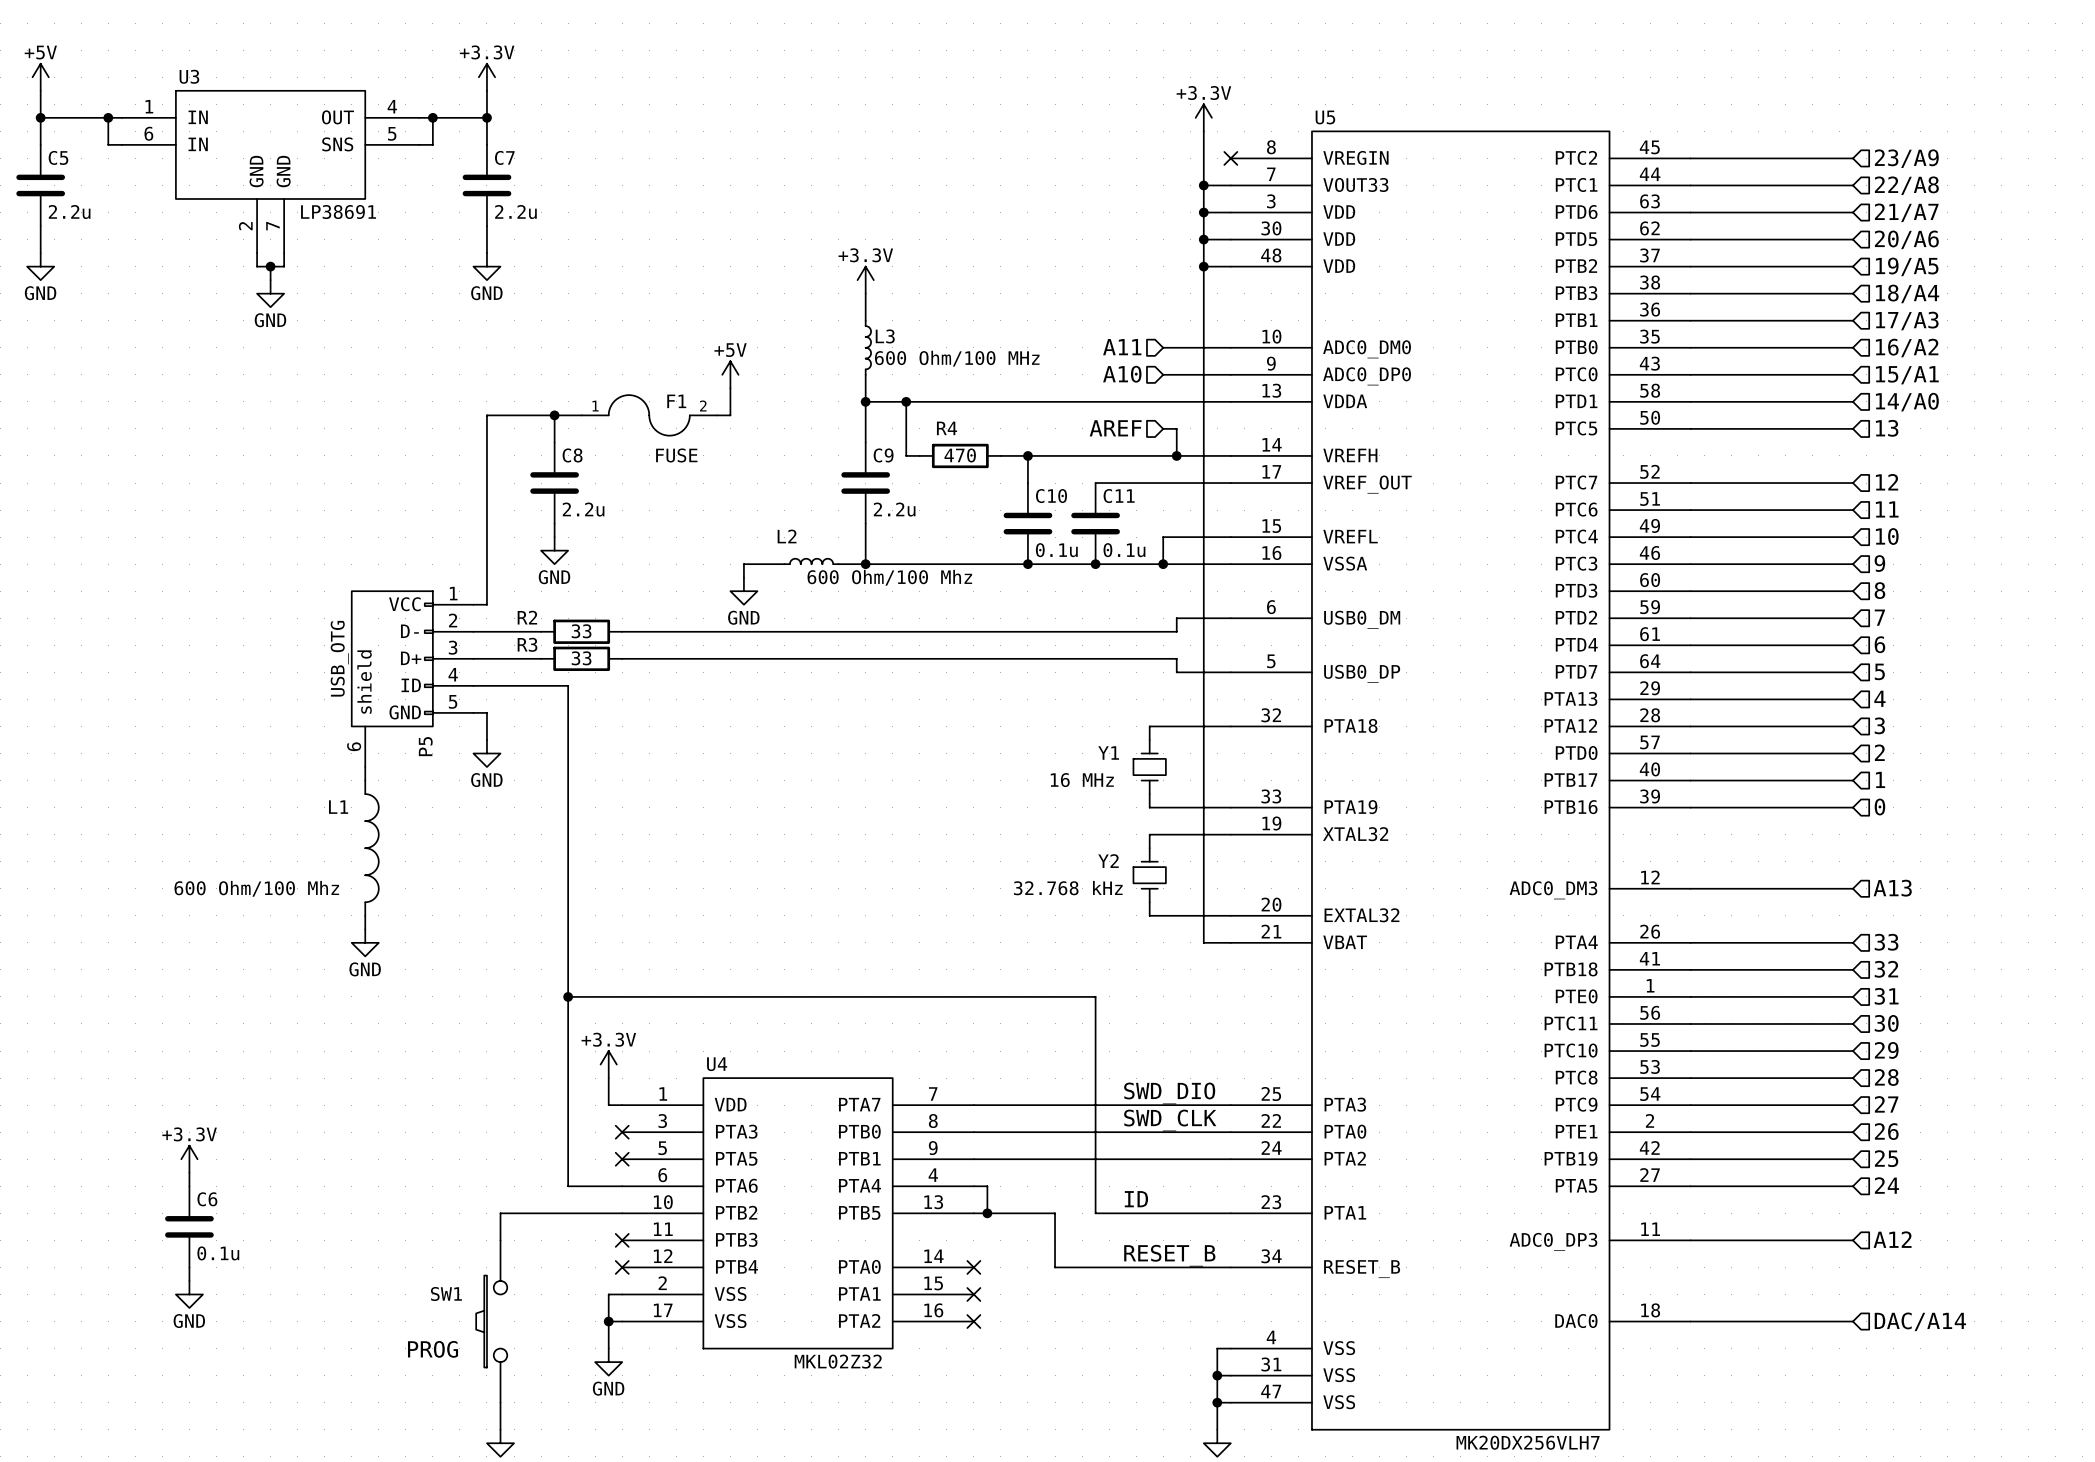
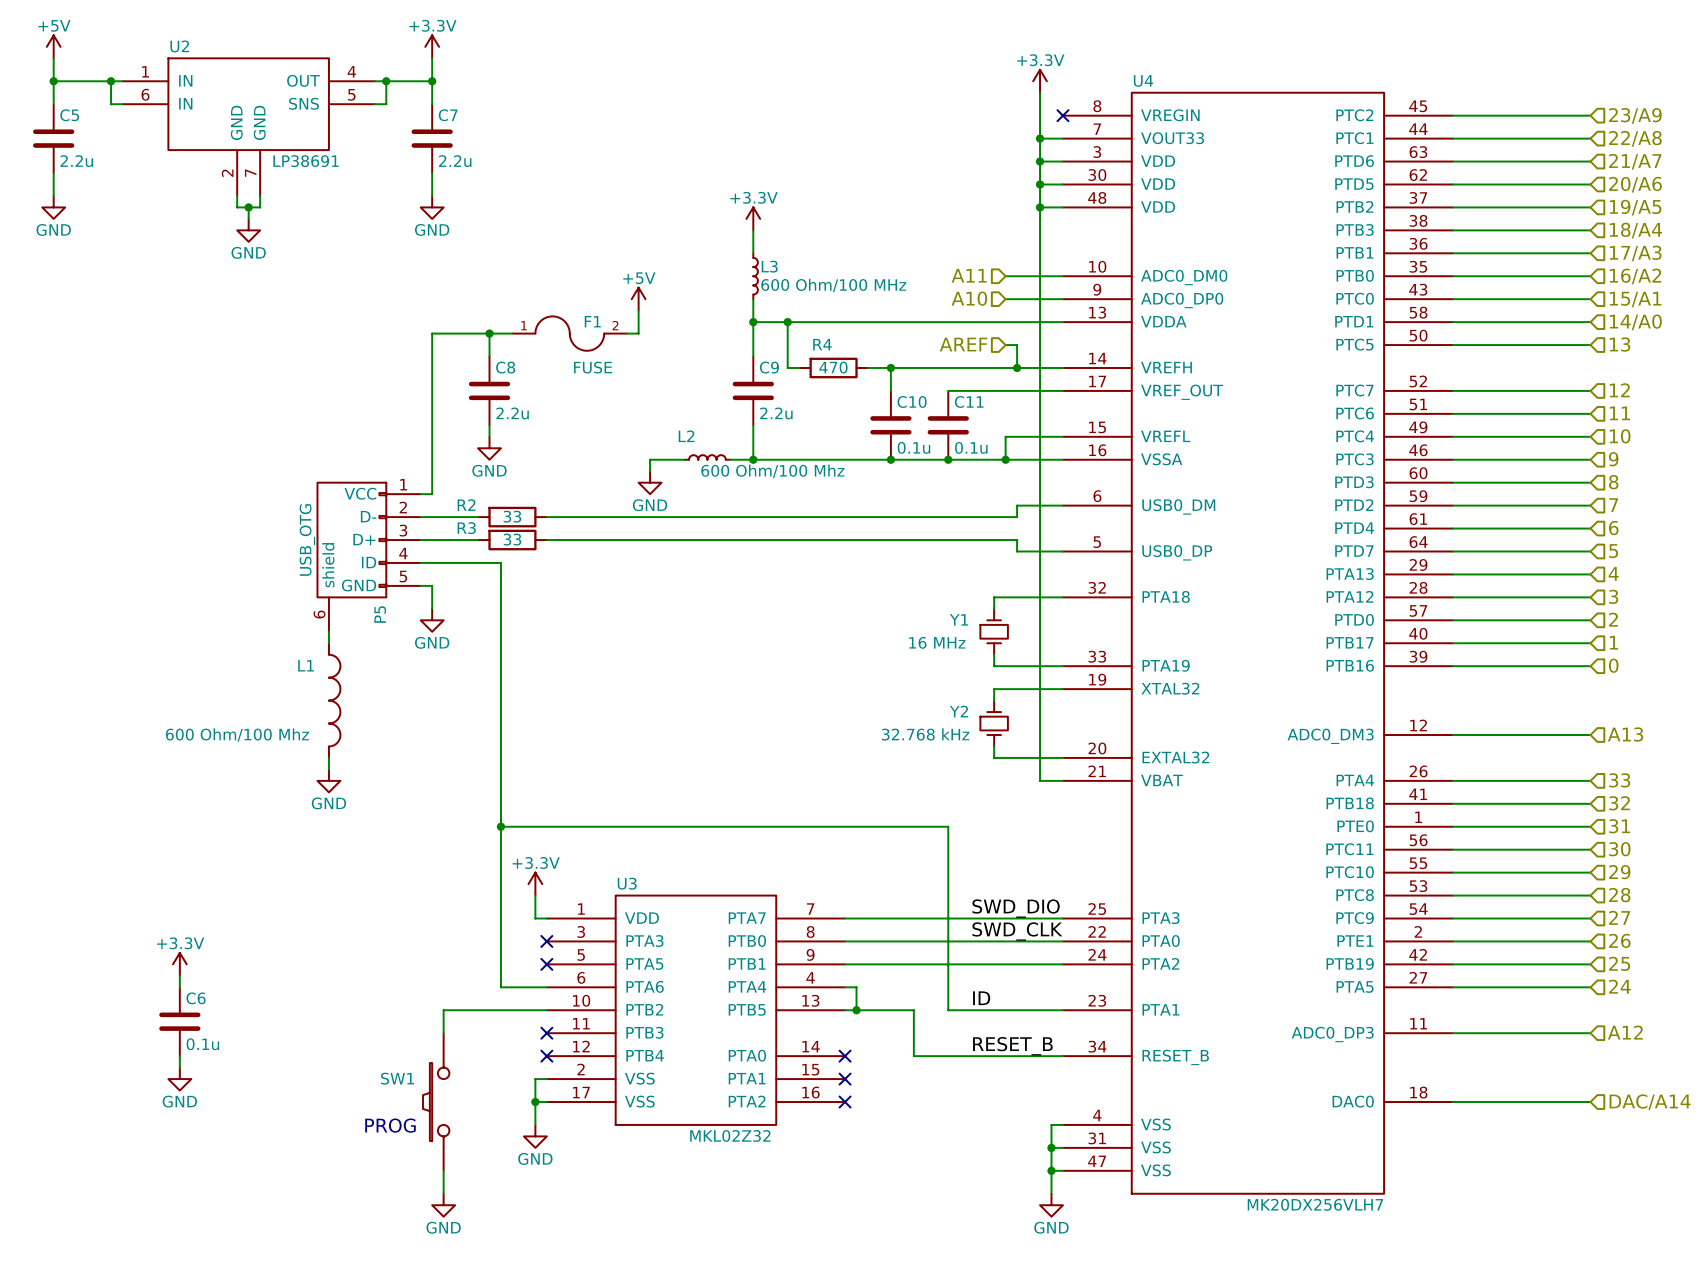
U3 name: U3 (189, 76) -> U2 (179, 46)
U5 name: U5 (1325, 117) -> U4 (1143, 80)
U4 name: U4 (717, 1064) -> U3 (627, 883)

